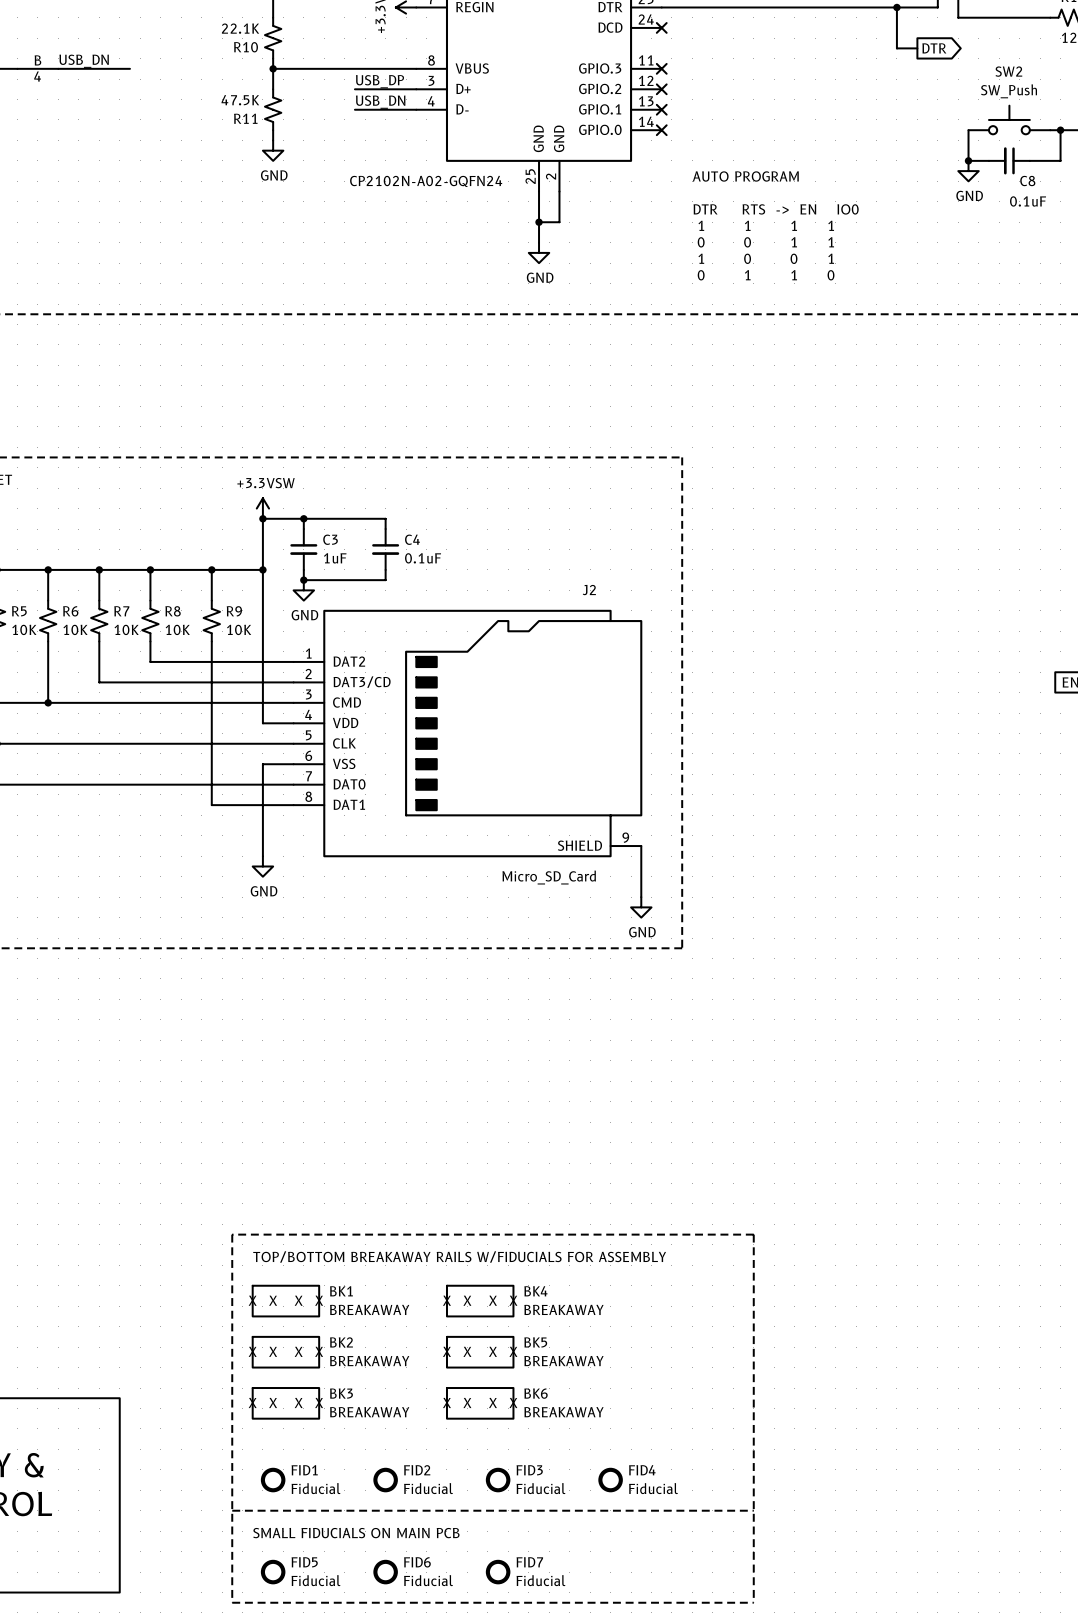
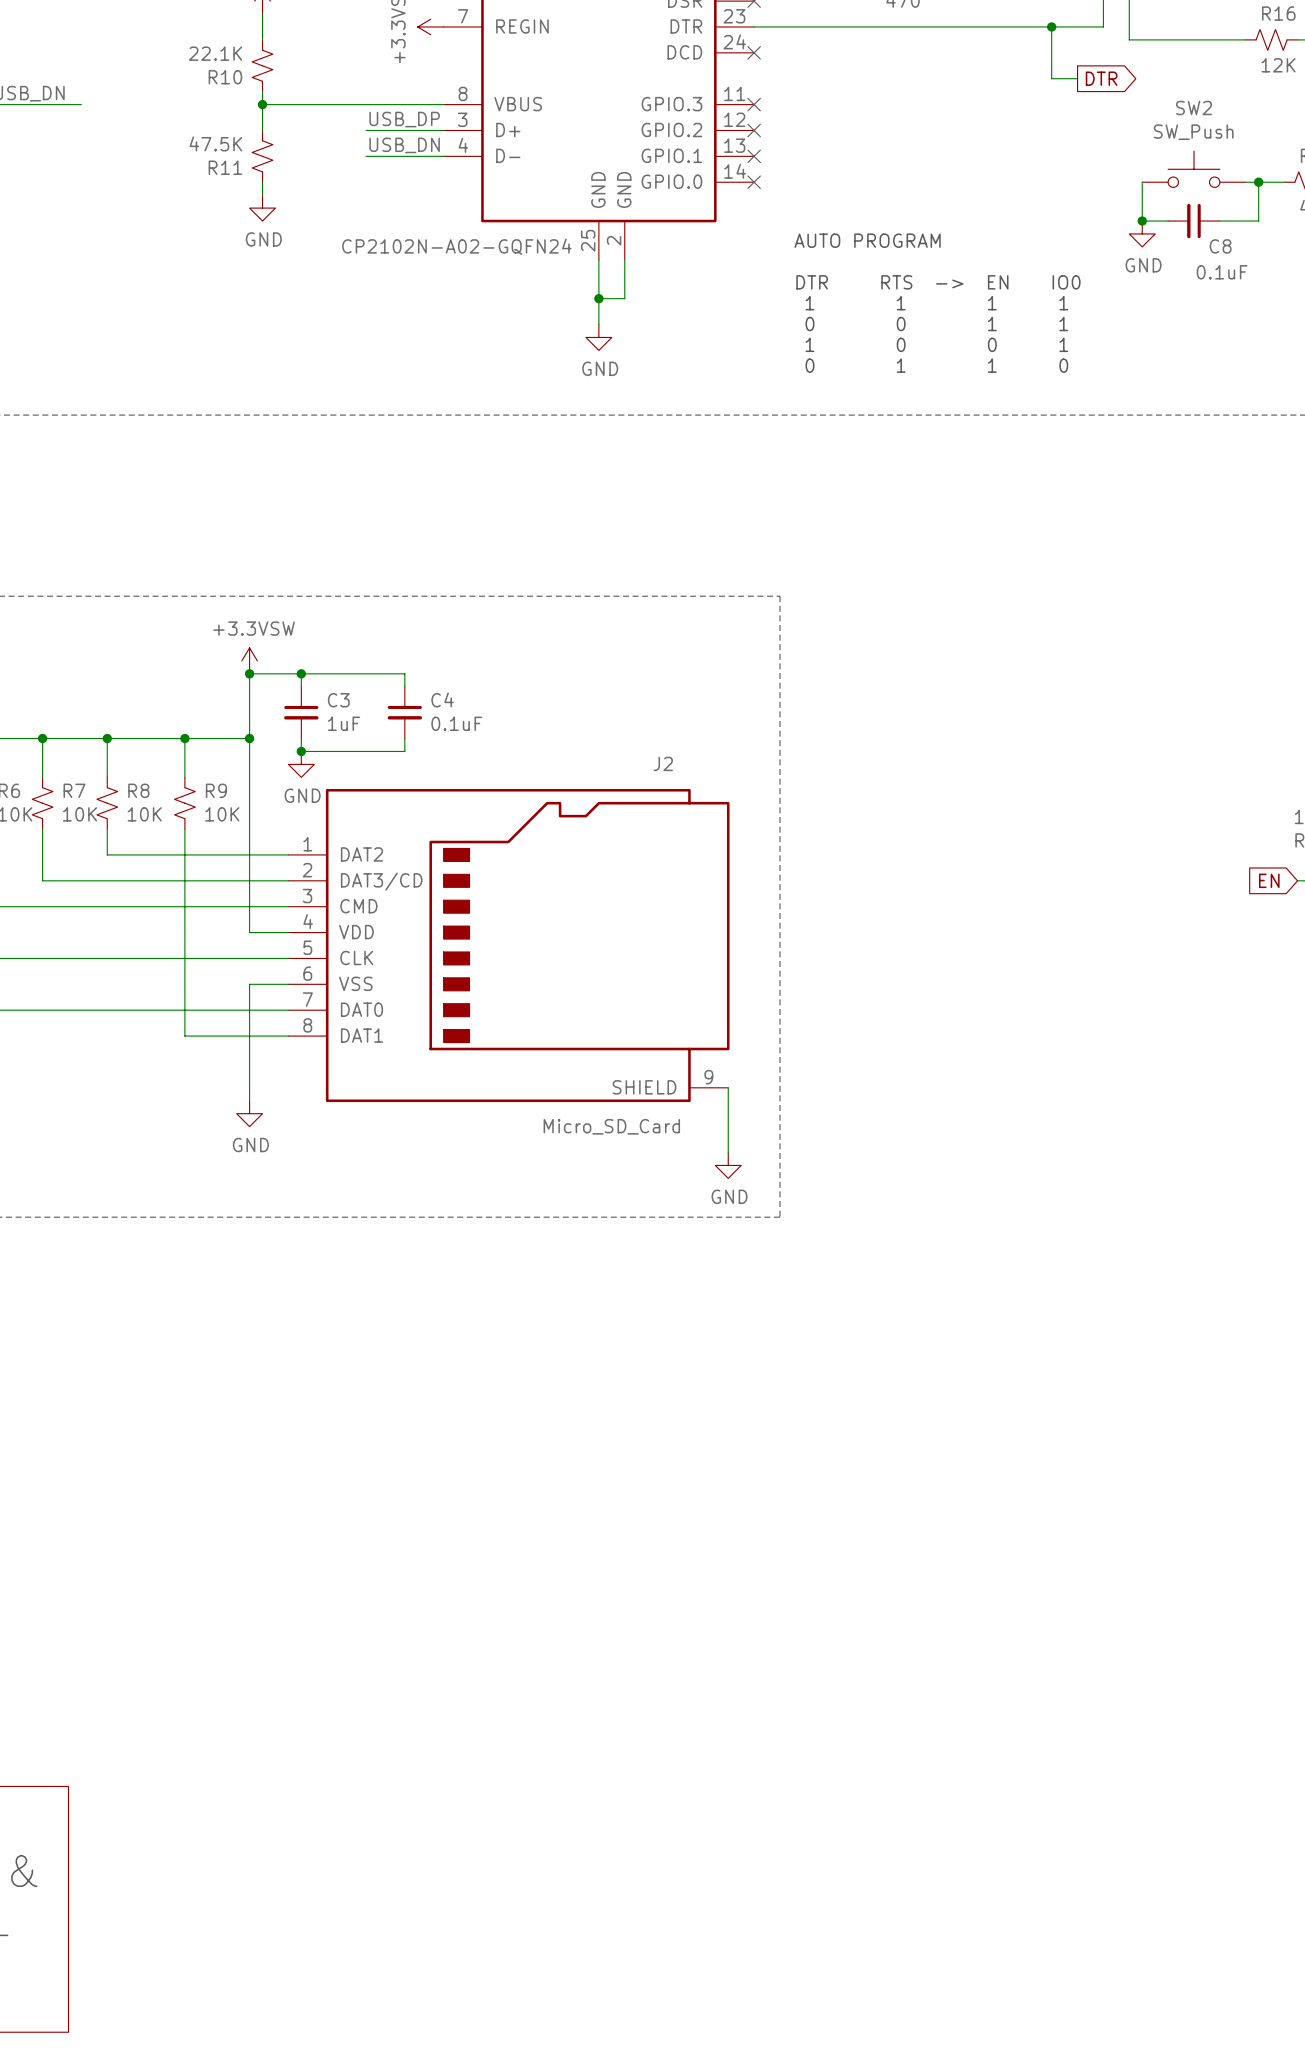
line: (232, 1234) (753, 1234) (753, 1602) (232, 1602) (232, 1234) -> none
text: TOP/BOTTOM BREAKAWAY RAILS W/FIDUCIALS FOR ASSEMBLY (459, 1256) -> none
BK1: BREAKAWAY (285, 1301) -> none
BK4: BREAKAWAY (480, 1301) -> none
BK2: BREAKAWAY (285, 1352) -> none
BK5: BREAKAWAY (480, 1352) -> none
BK3: BREAKAWAY (285, 1403) -> none
BK6: BREAKAWAY (480, 1403) -> none
FID1: Fiducial (273, 1480) -> none
FID2: Fiducial (385, 1480) -> none
FID3: Fiducial (498, 1480) -> none
FID4: Fiducial (610, 1480) -> none
line: (232, 1510) (753, 1510) -> none
text: SMALL FIDUCIALS ON MAIN PCB (356, 1533) -> none
FID5: Fiducial (273, 1572) -> none
FID6: Fiducial (385, 1572) -> none
FID7: Fiducial (498, 1572) -> none

